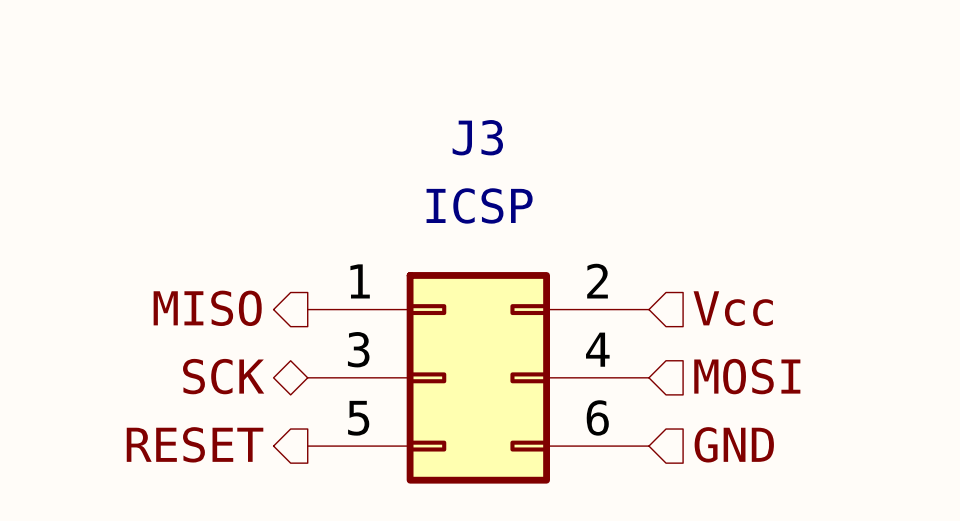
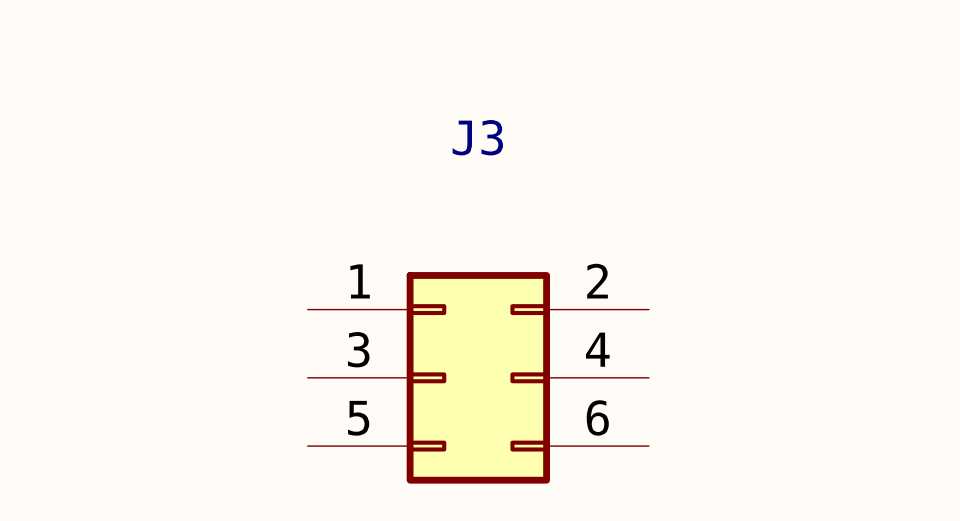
J3 value: ICSP (479, 205) -> none
hierarchical label: MISO (207, 308) -> none
hierarchical label: Vcc (733, 308) -> none
hierarchical label: SCK (223, 376) -> none
hierarchical label: MOSI (747, 376) -> none
hierarchical label: RESET (195, 444) -> none
hierarchical label: GND (734, 444) -> none

